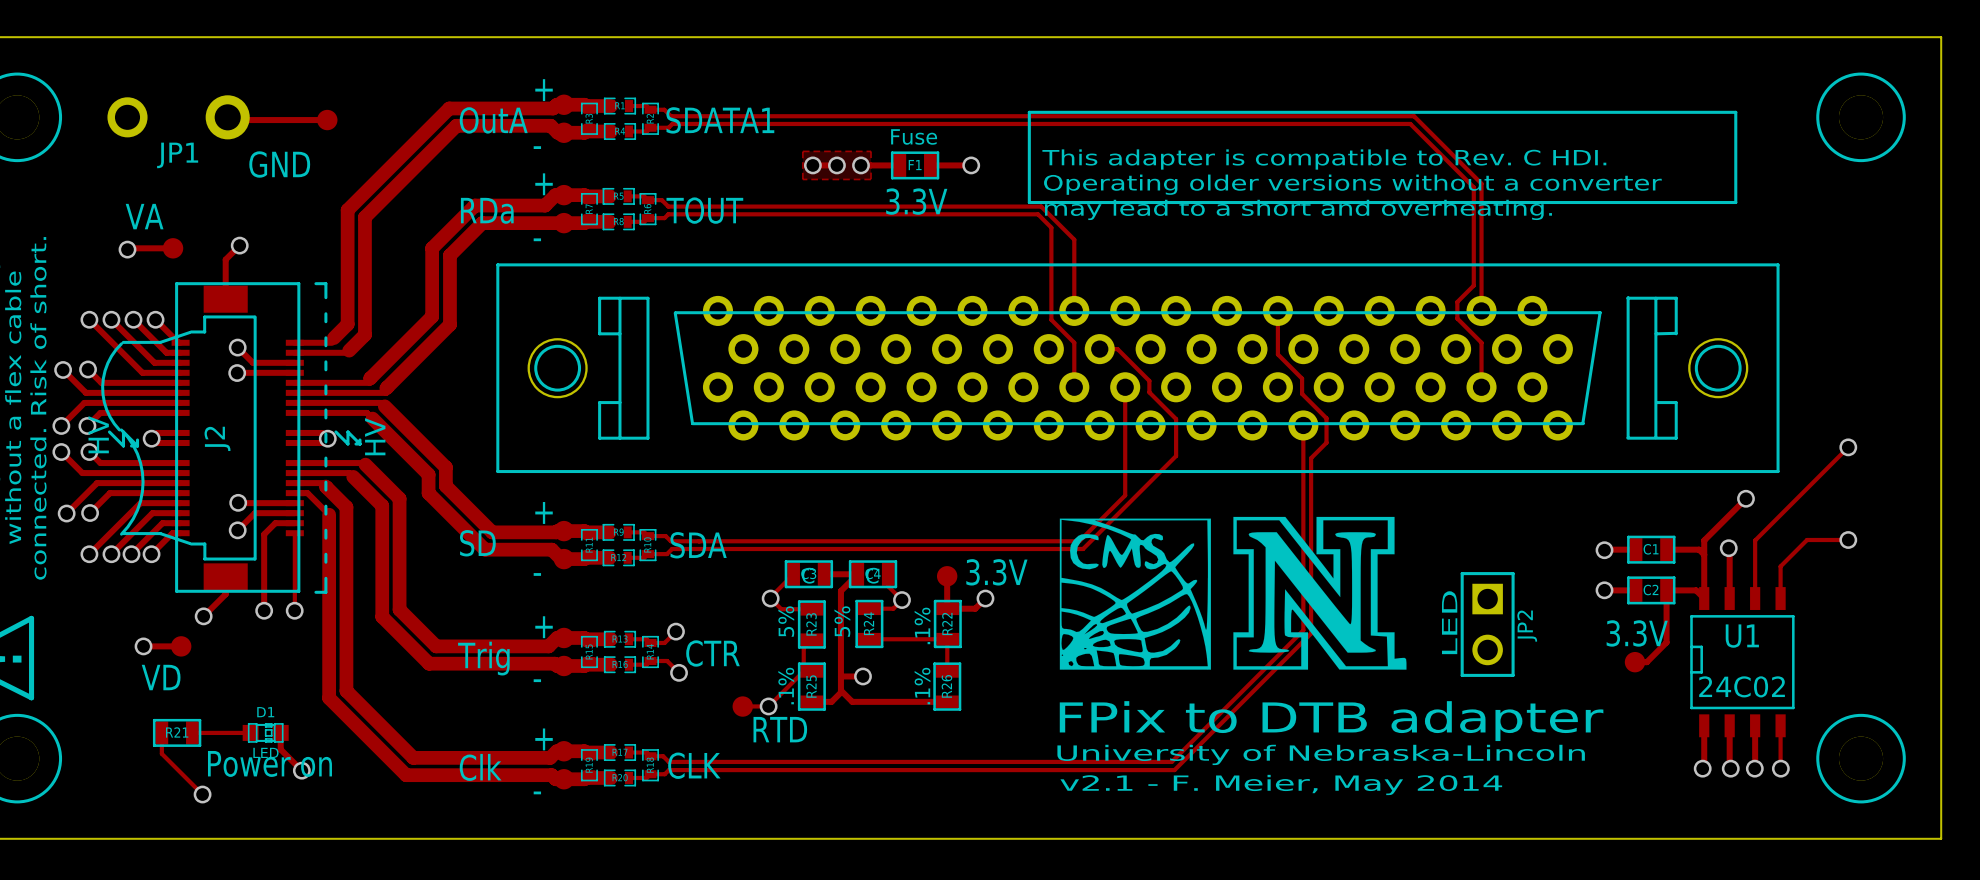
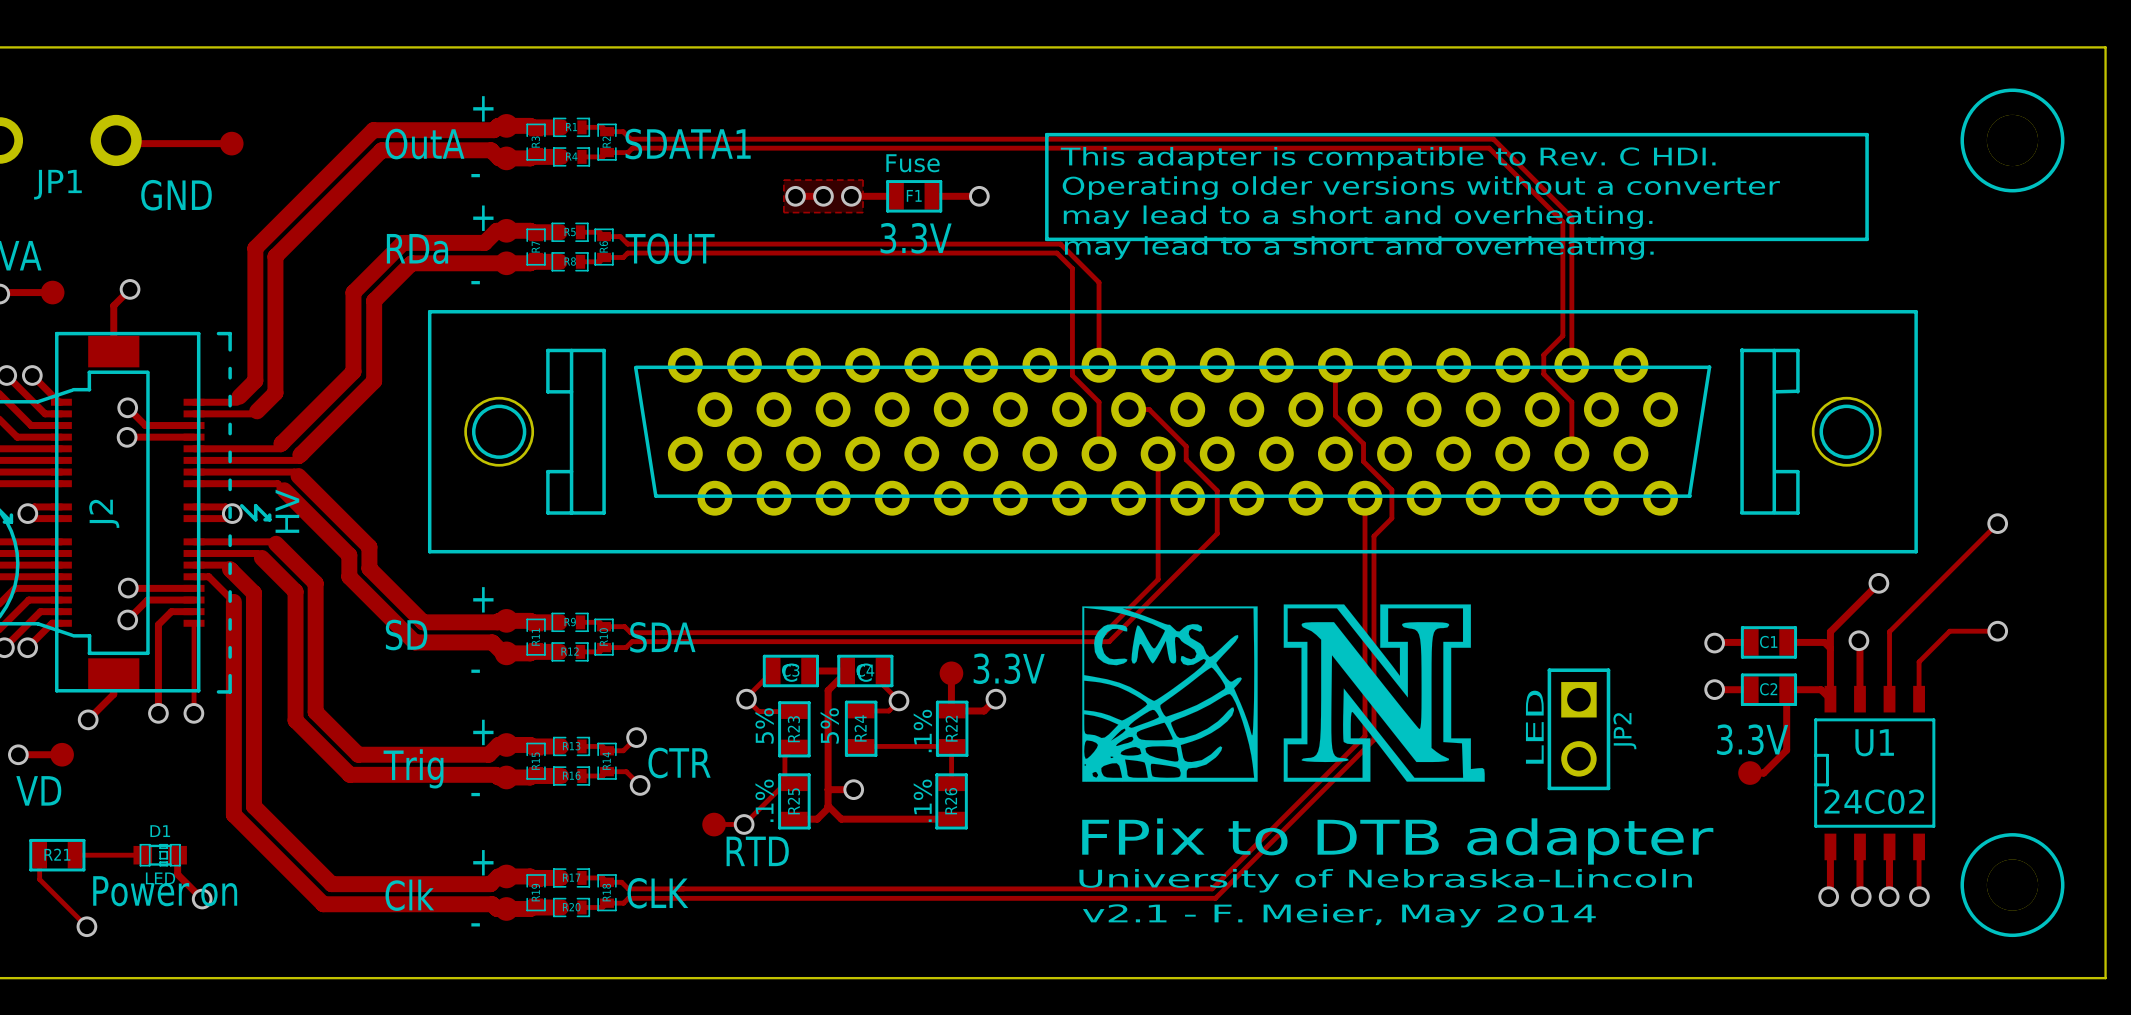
text: none -> This adapter is compatible to Rev. C HDI. (1388, 158)
text: This adapter is compatible to Rev. C HDI. (1324, 159) -> Operating older versions without a converter (1421, 187)
text: Operating older versions without a converter (1352, 184) -> may lead to a short and overheating. (1358, 217)

